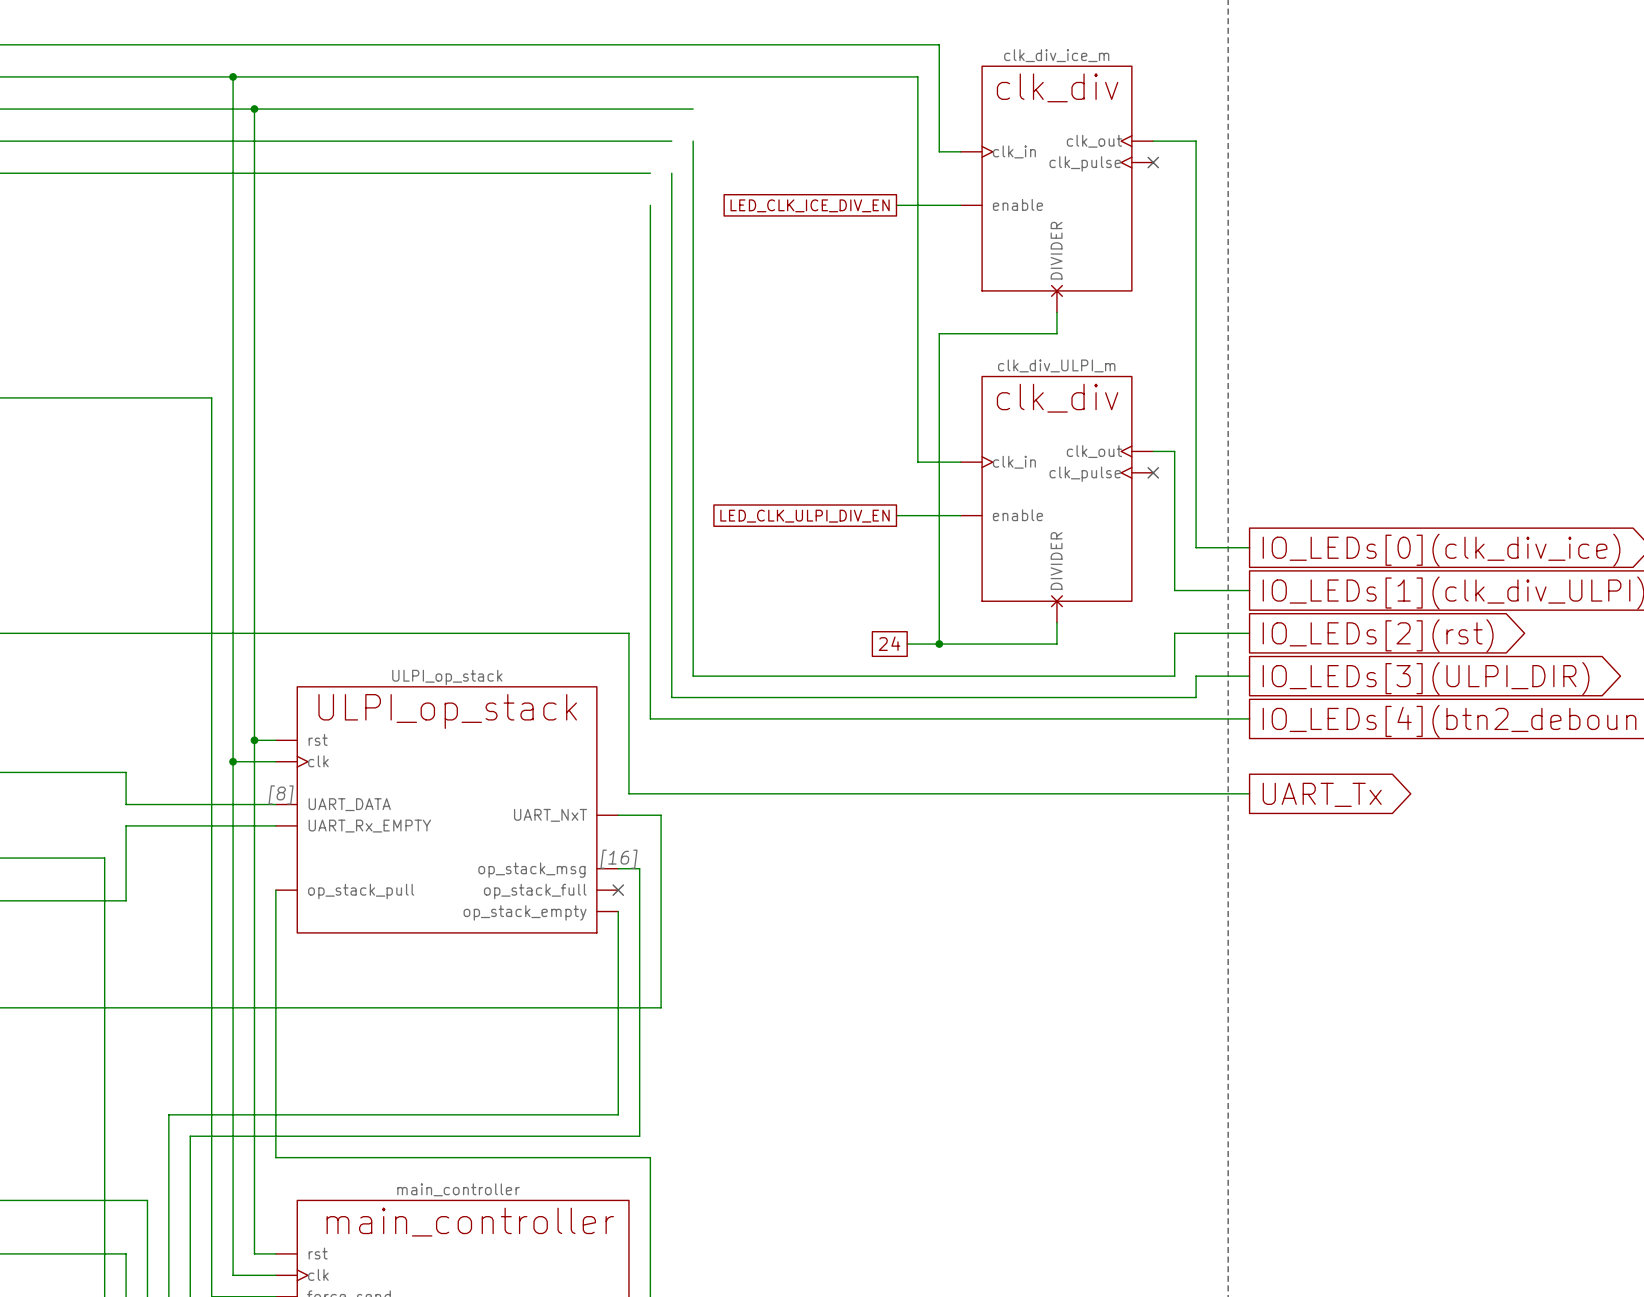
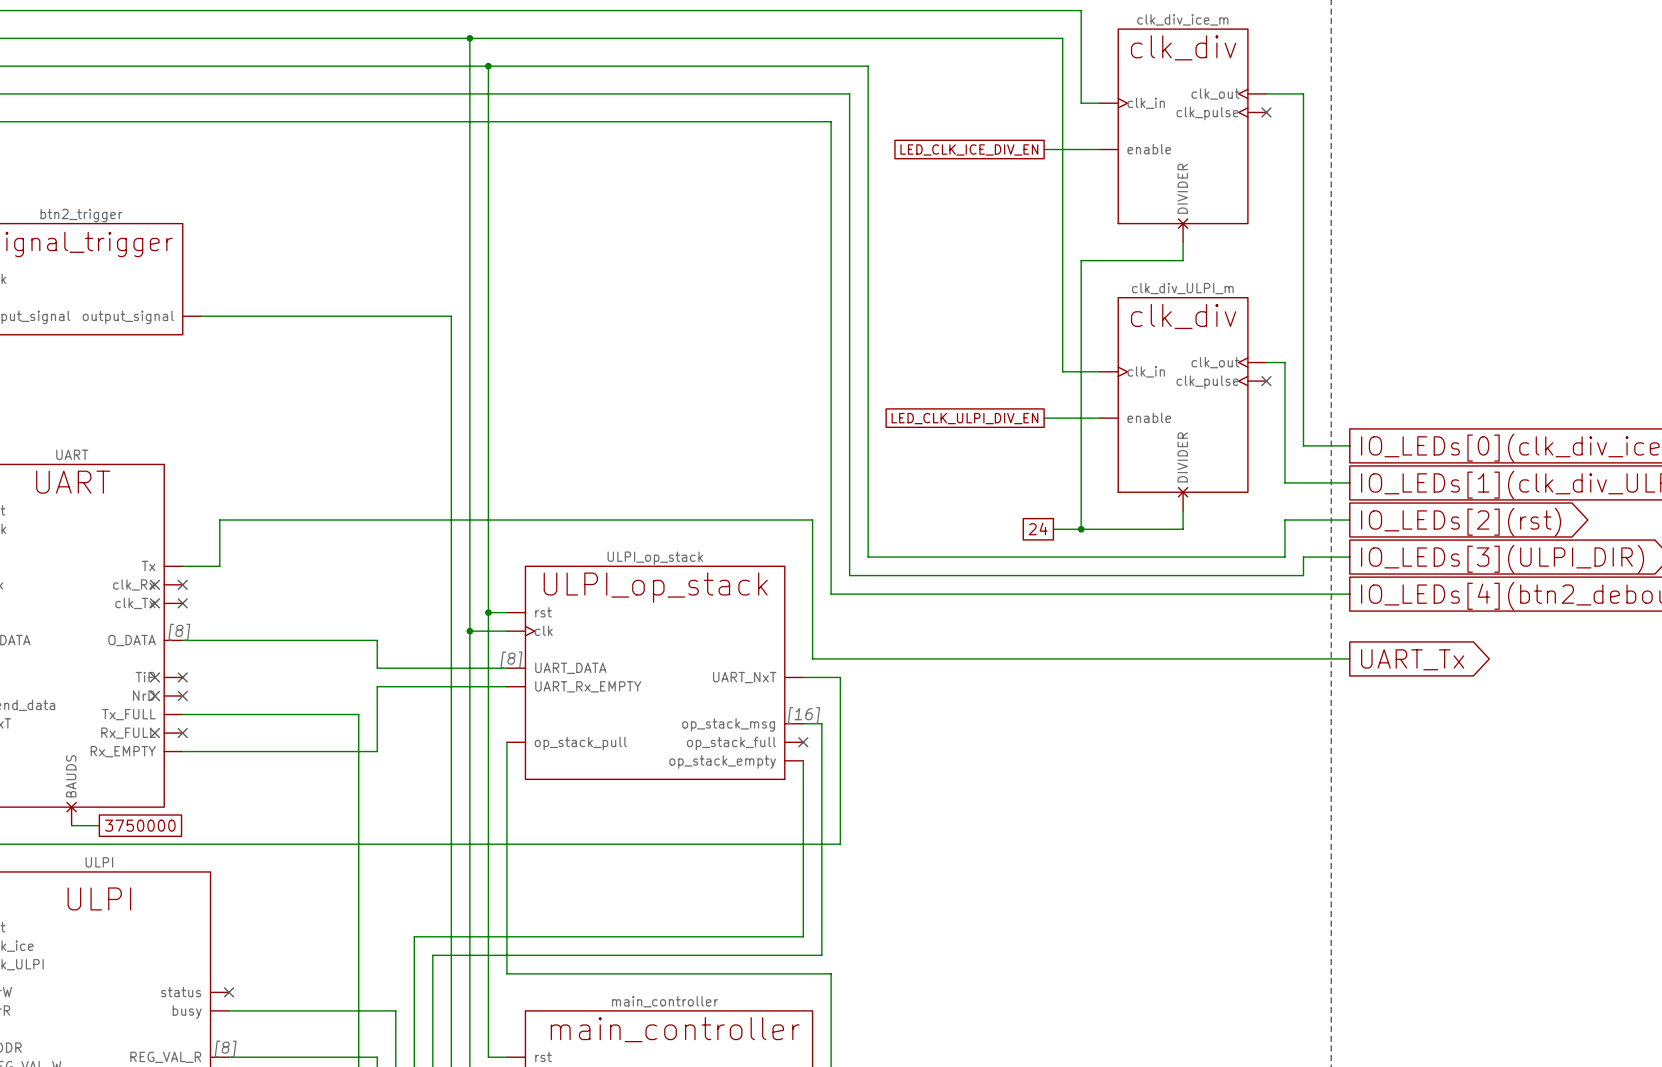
wire: none -> (868, 66) (868, 93)
wire: none -> (849, 93) (849, 121)
wire: none -> (831, 121) (831, 149)

